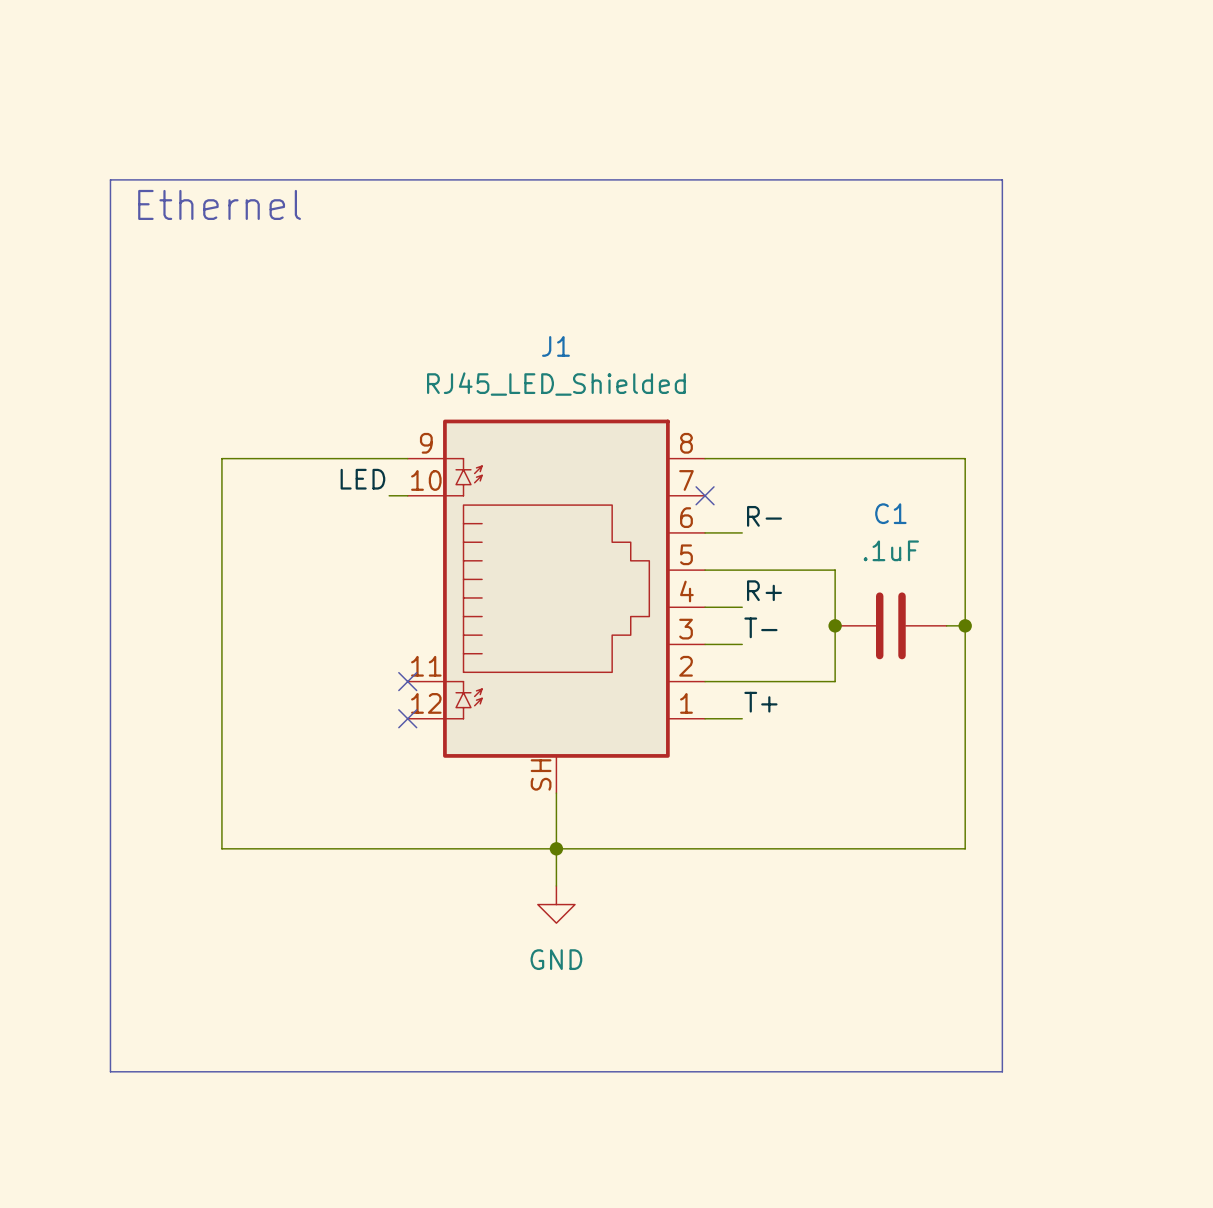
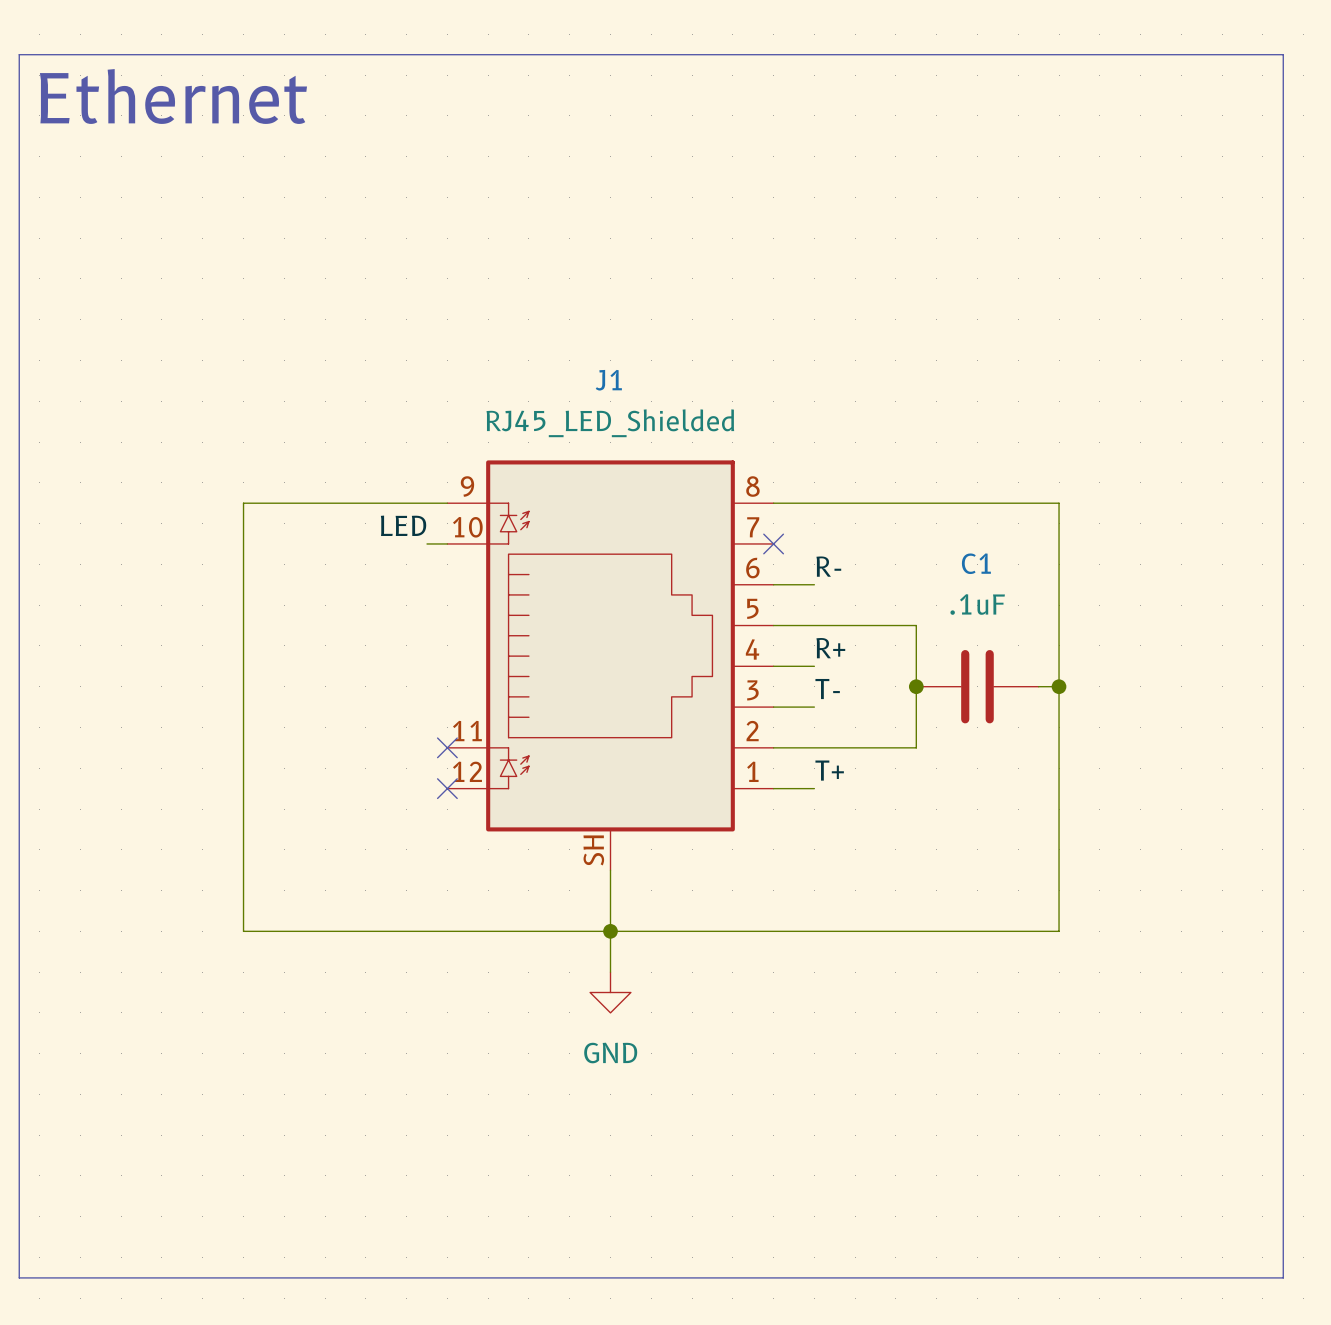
text: none -> Ethernet (173, 96)
line: (110, 179) (1002, 179) (1002, 1071) (110, 1071) (110, 179) -> (19, 54) (19, 1277) (1283, 1277) (1283, 54) (19, 54)
text: Ethernel (219, 204) -> none

